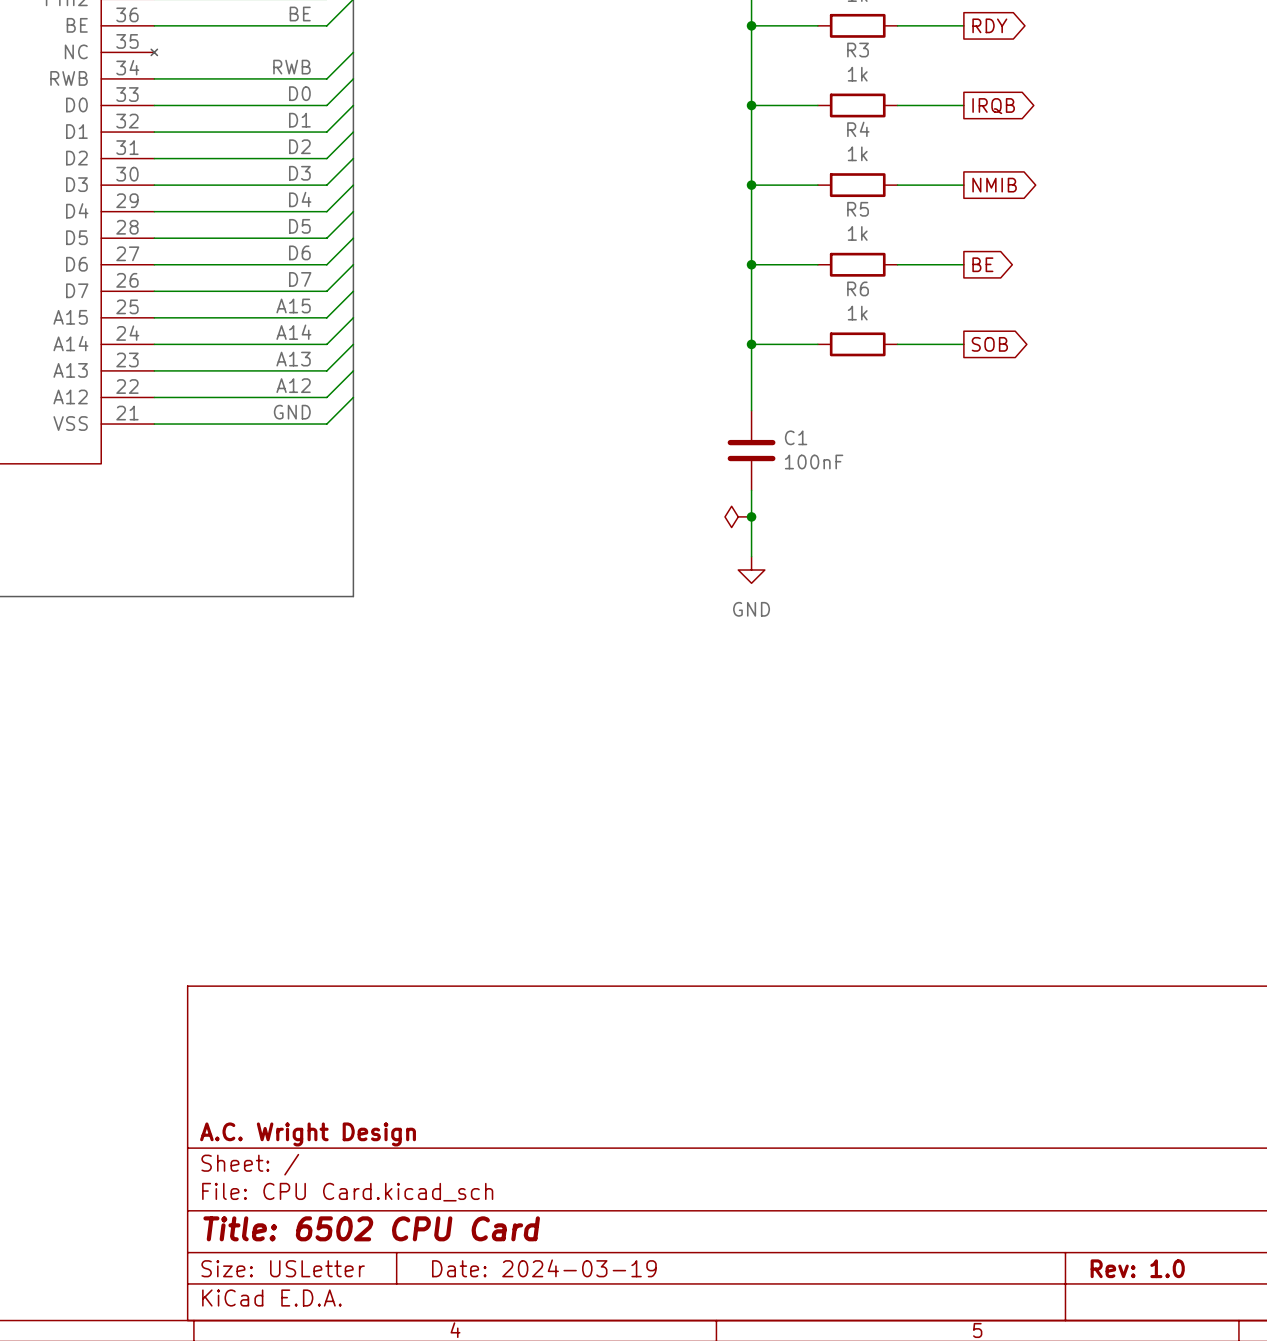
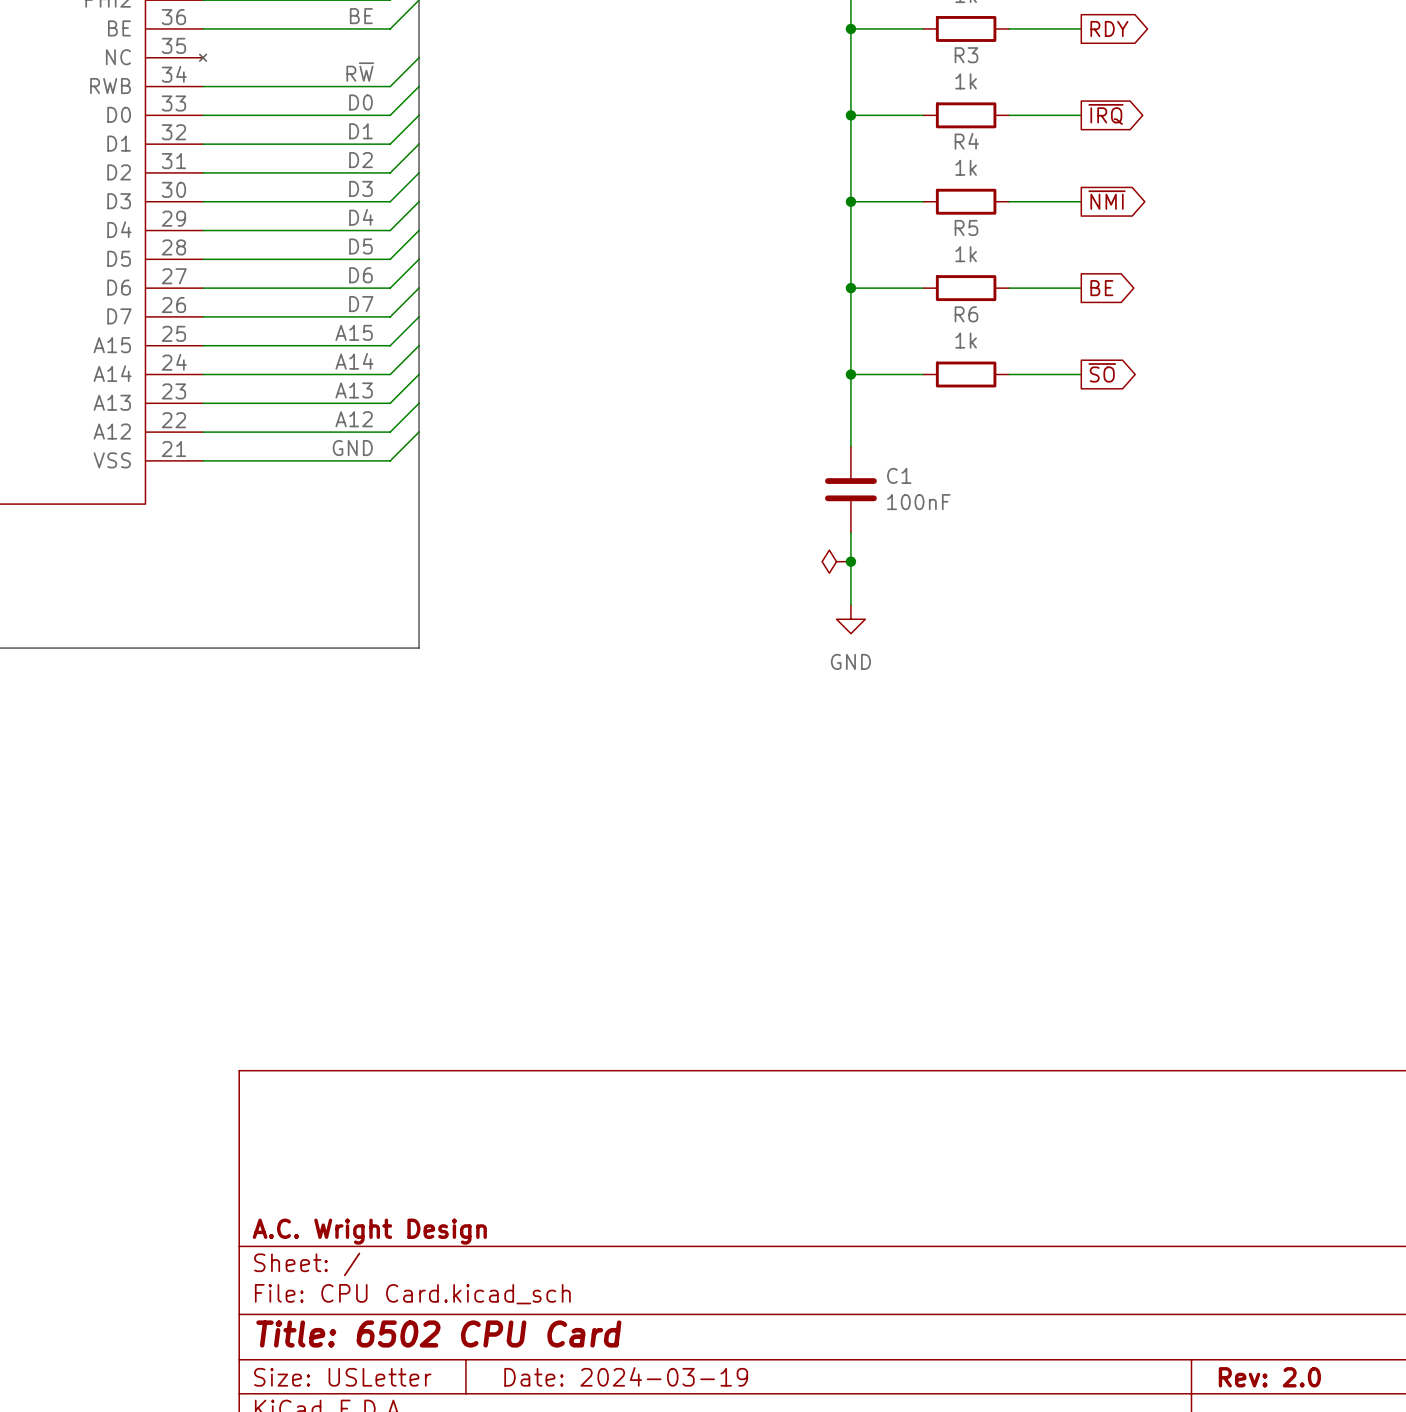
label: RWB (291, 67) -> R~{W} (360, 72)
global label: IRQB (993, 106) -> ~{IRQ} (1106, 114)
global label: NMIB (994, 185) -> ~{NMI} (1107, 200)
global label: SOB (989, 344) -> ~{SO} (1102, 372)
title block: Rev: 1.0 (1137, 1268) -> Rev: 2.0 (1269, 1377)

